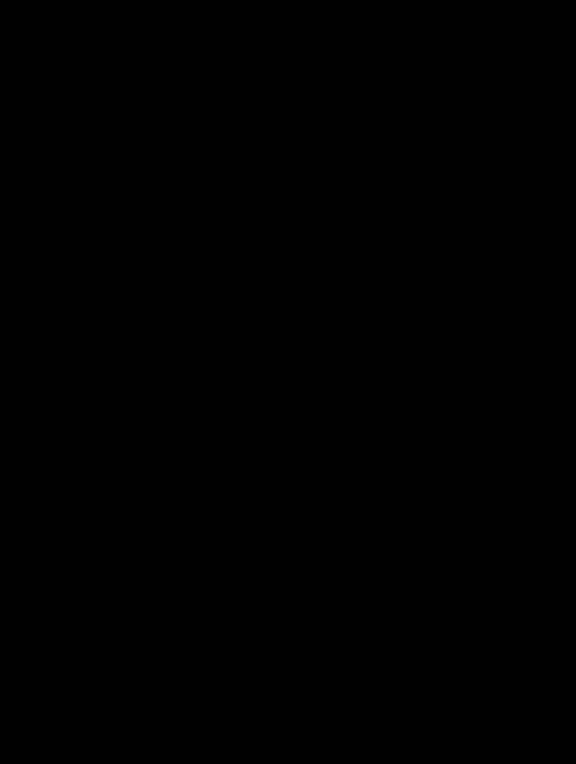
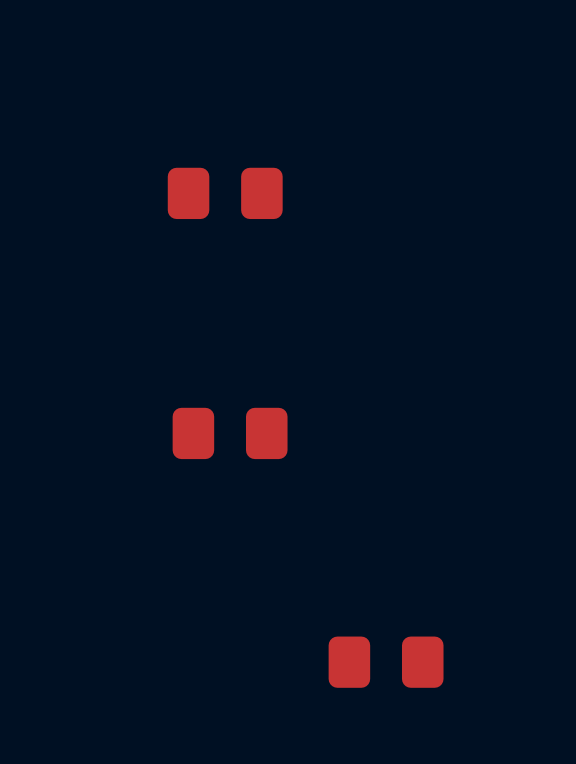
part: none -> (225, 193)
part: none -> (230, 433)
part: none -> (386, 662)

